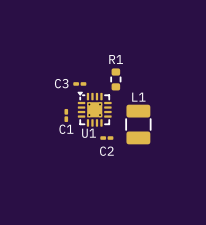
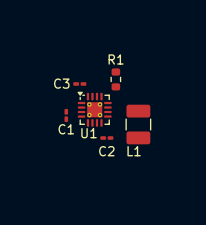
L1 name position: L1 (138, 97) -> L1 (134, 151)

